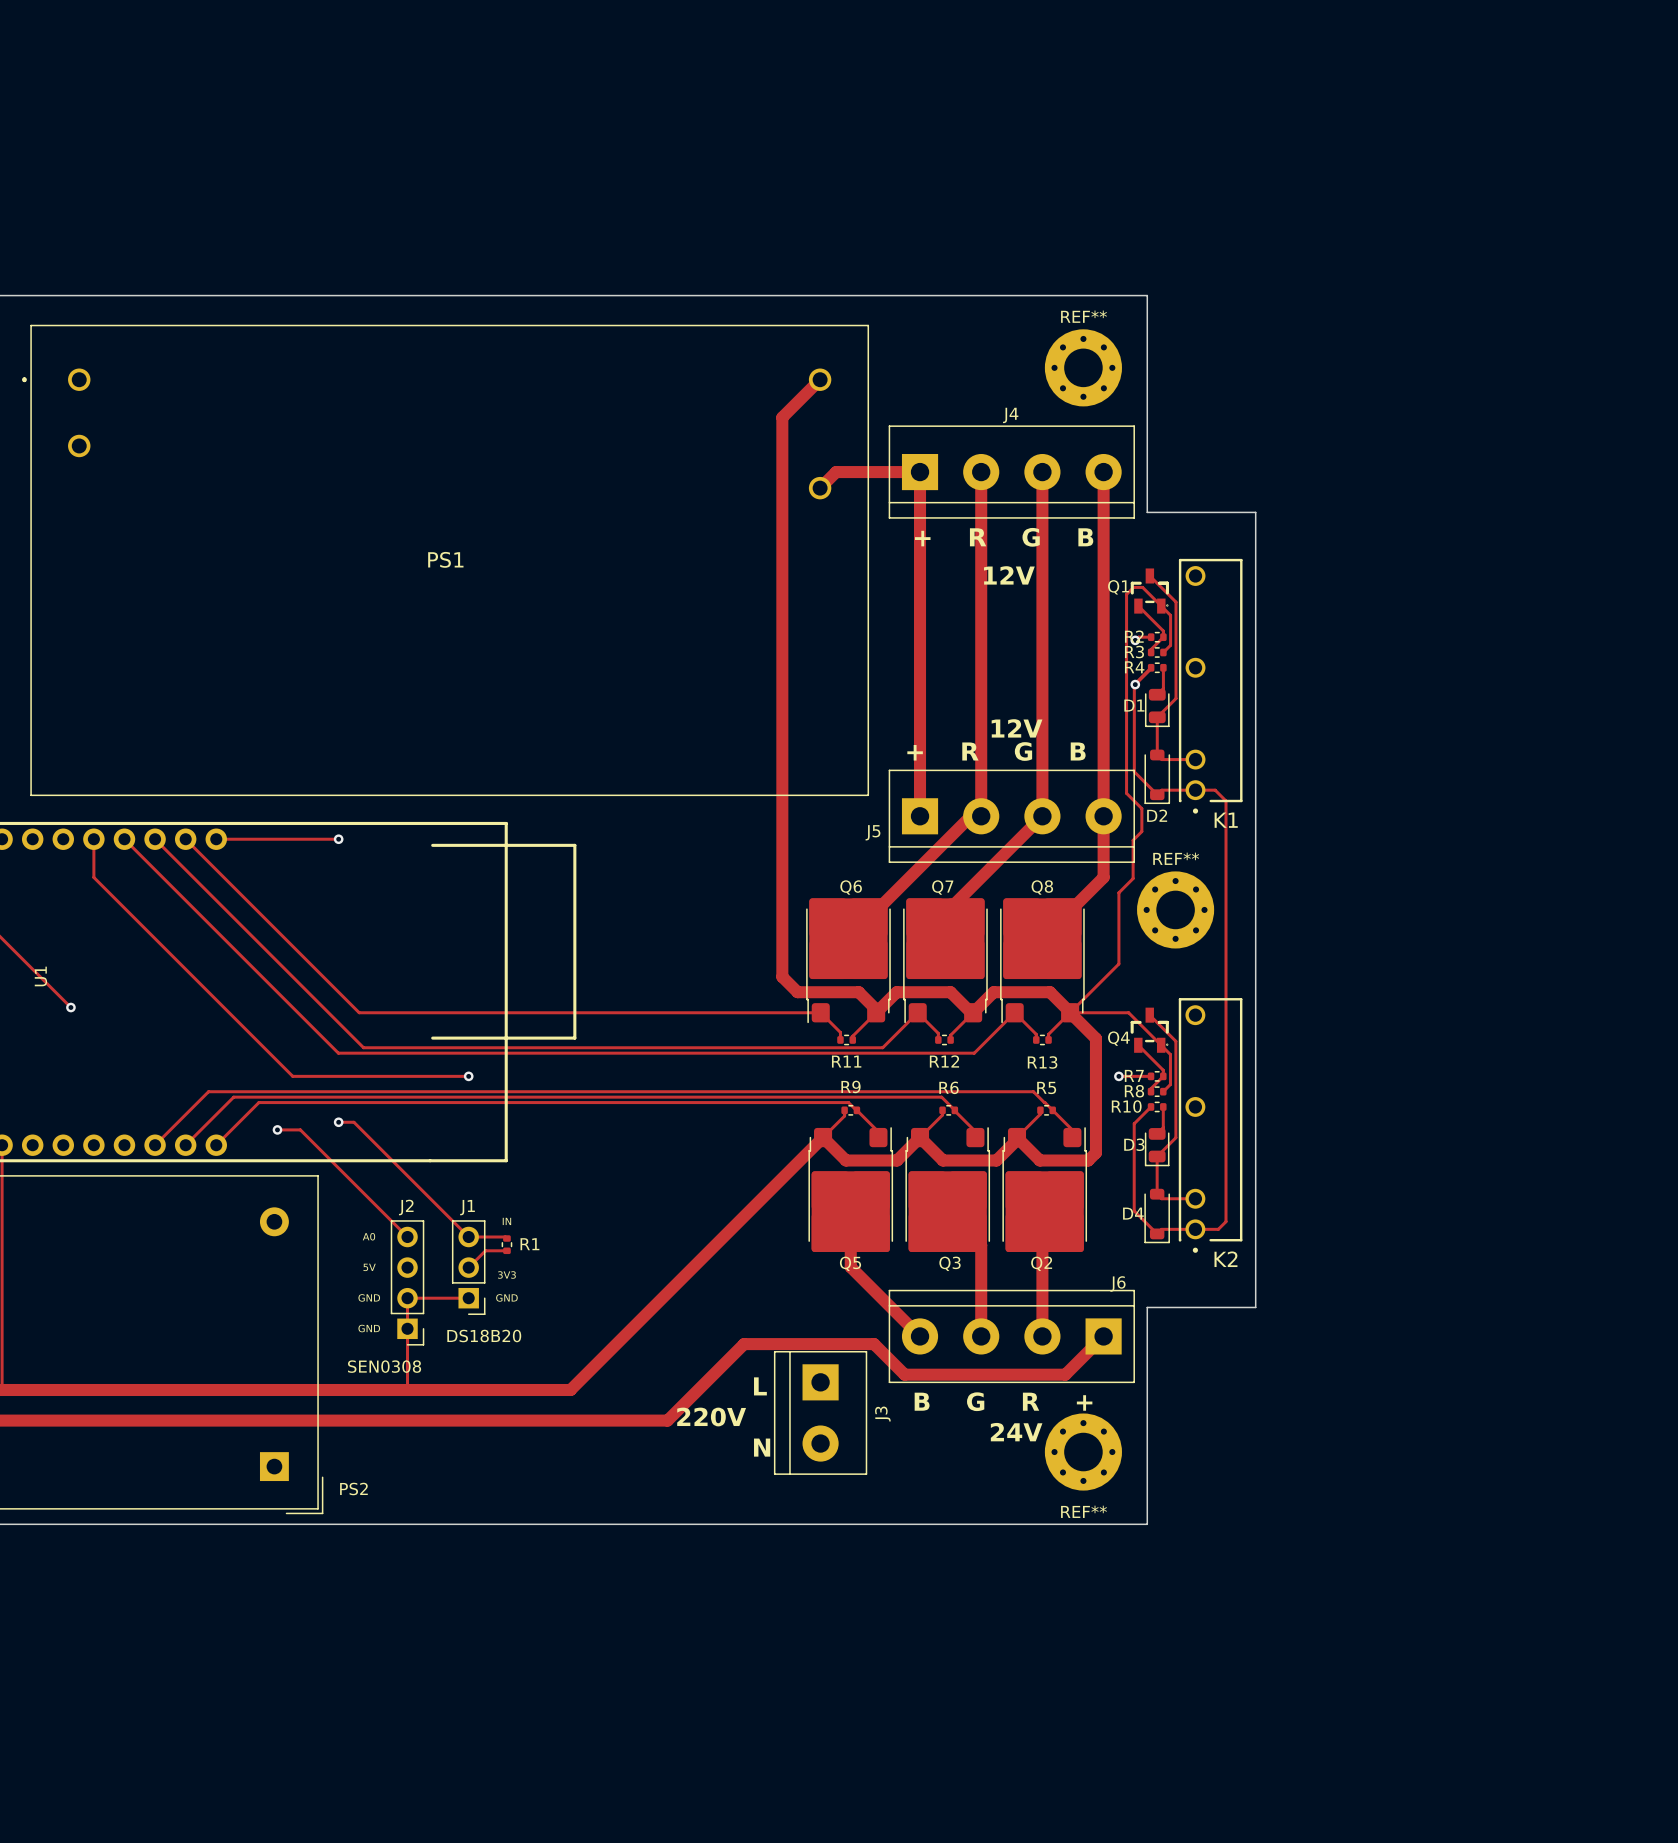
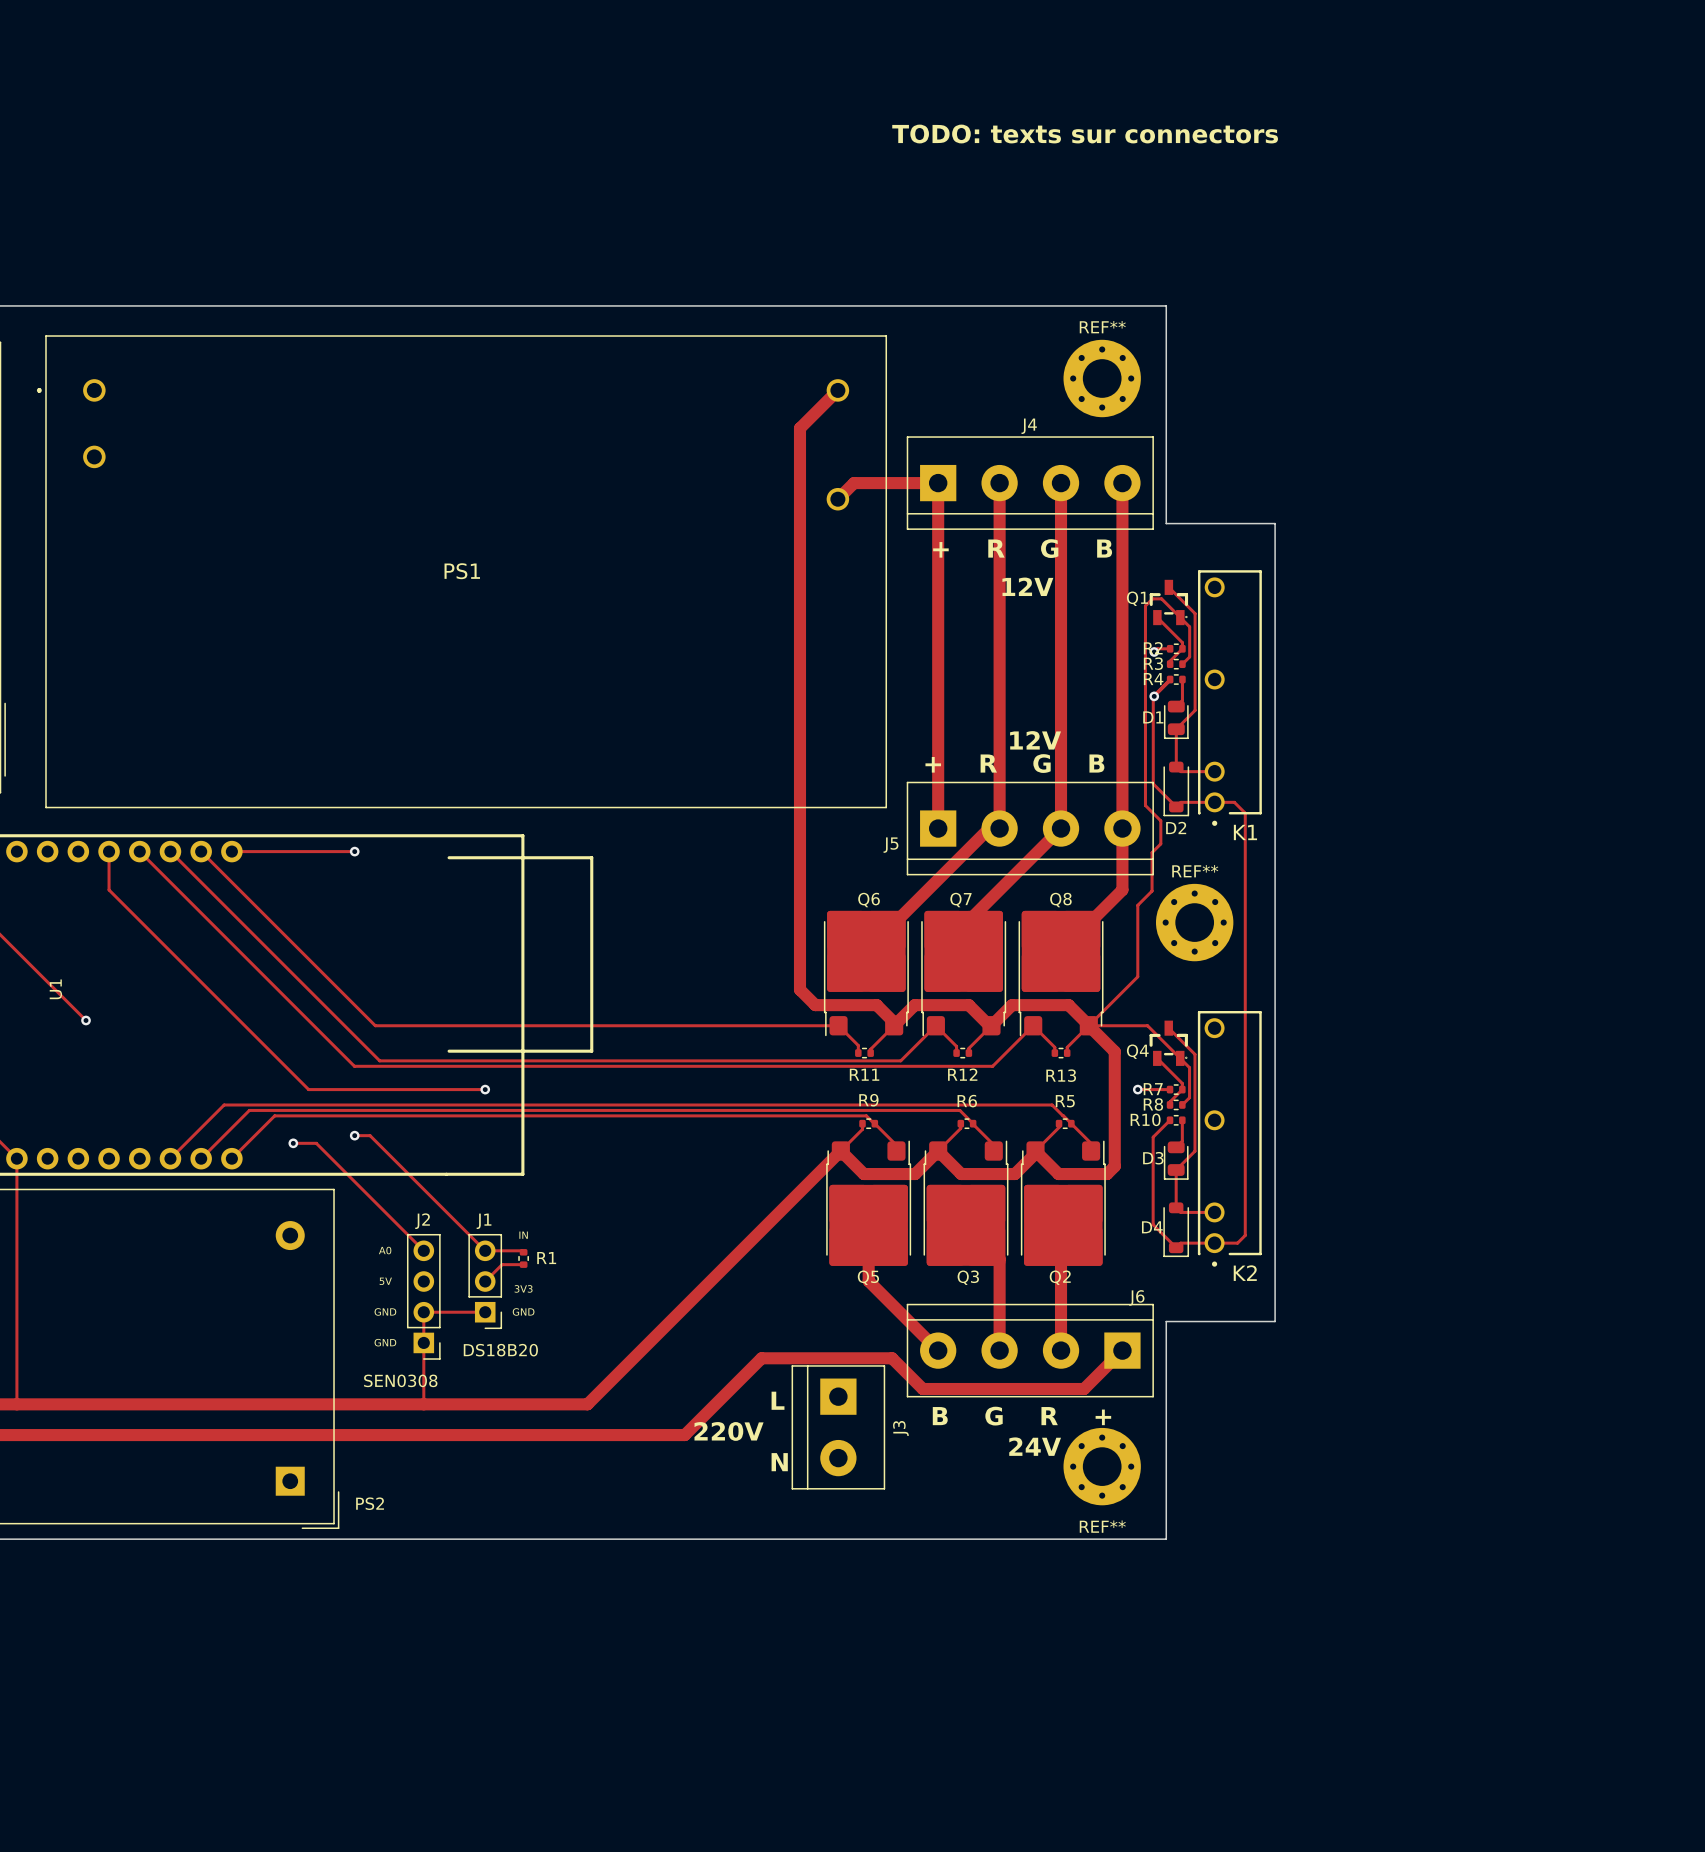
text: none -> TODO: texts sur connectors (1085, 134)

